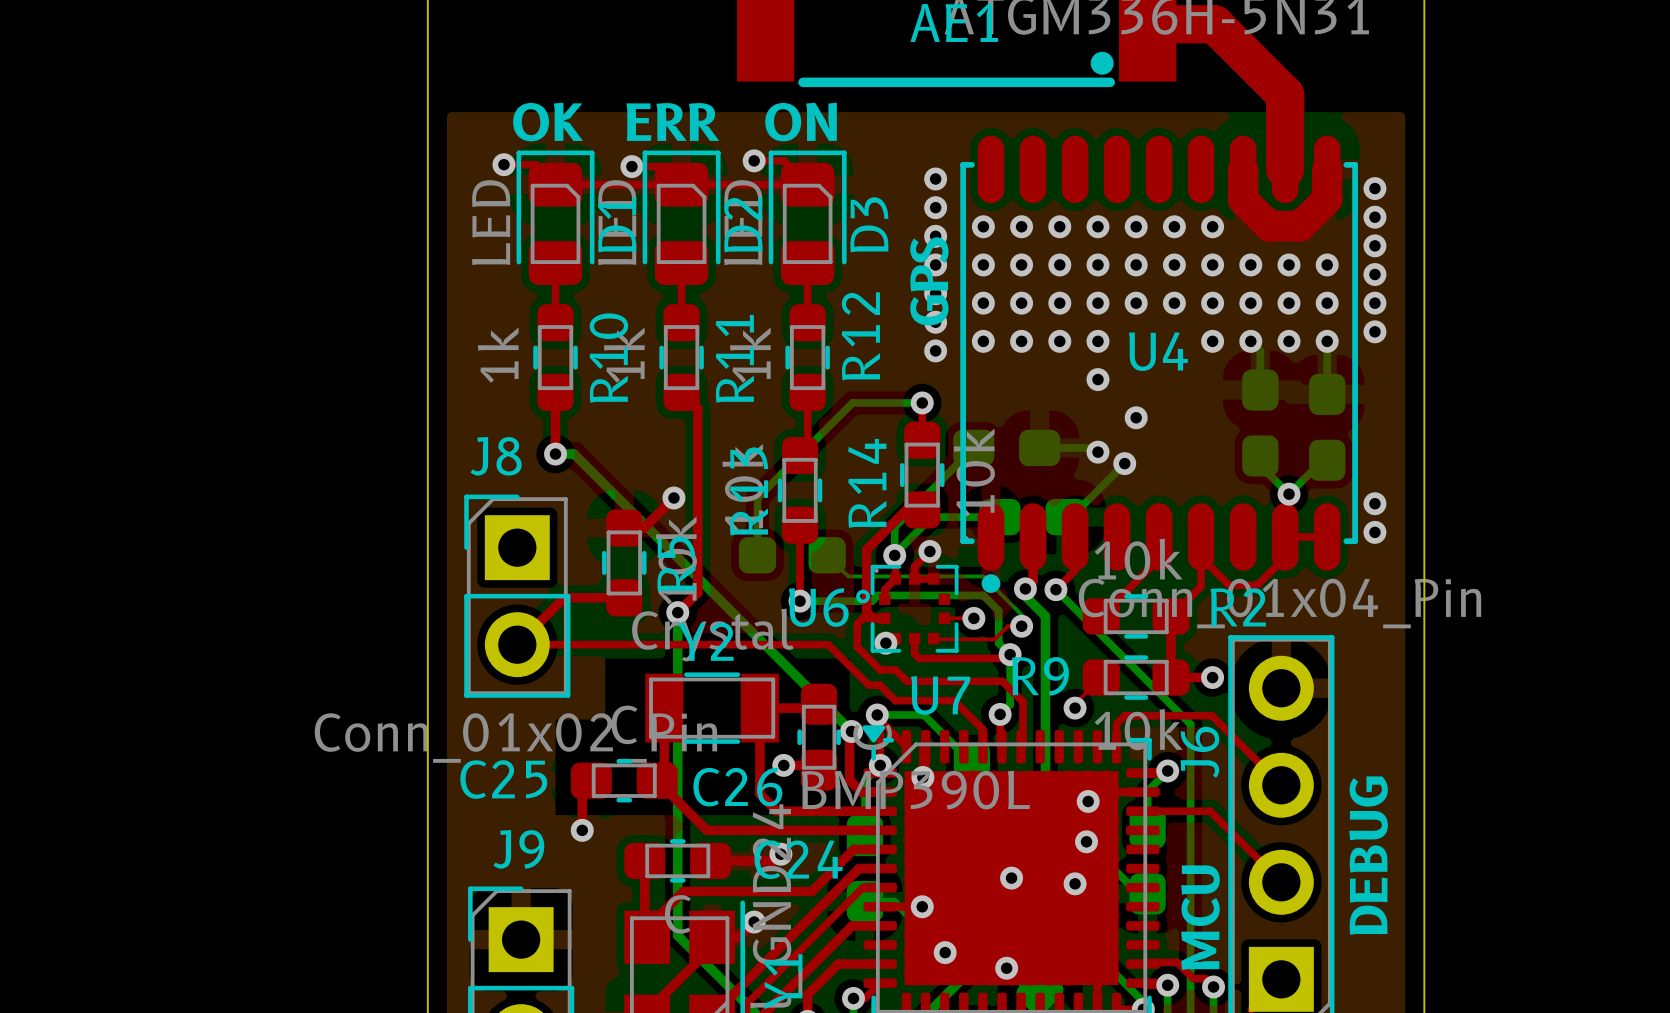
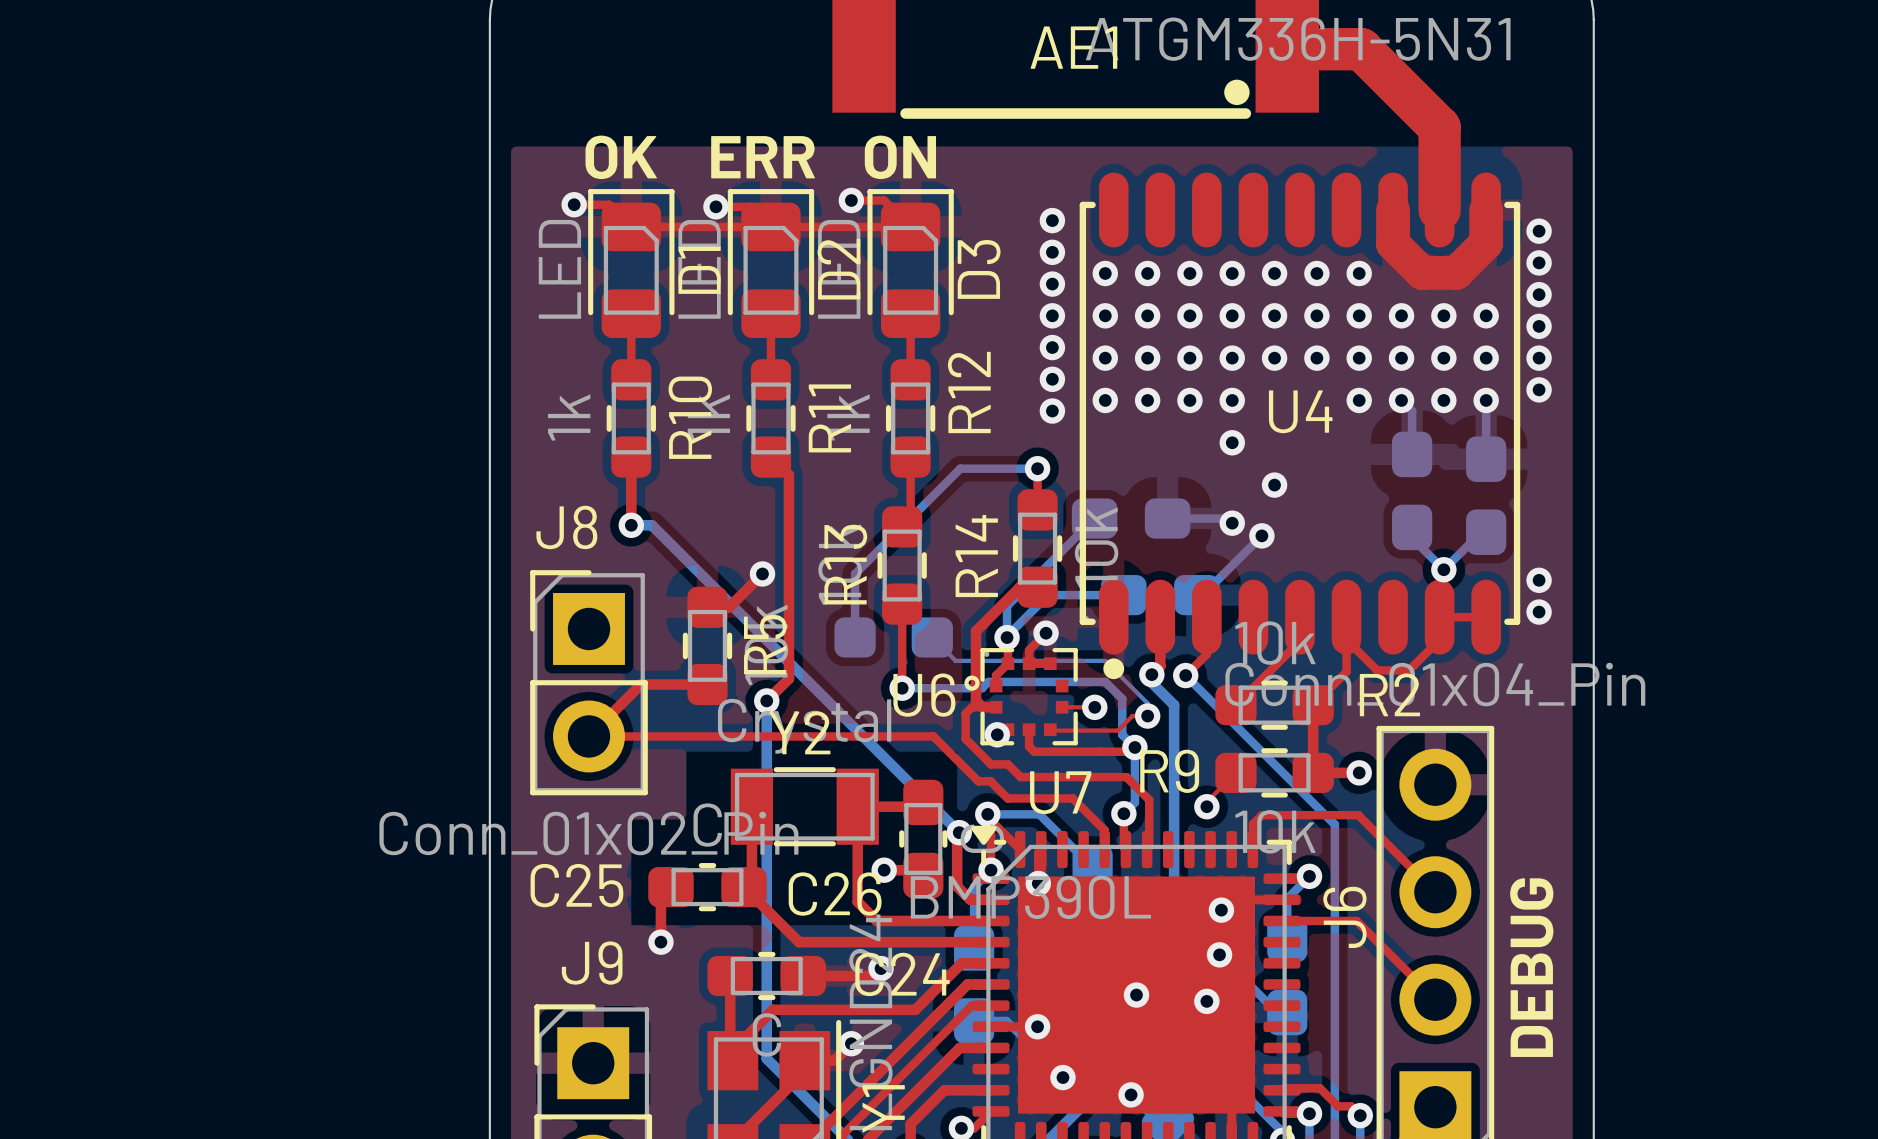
text: GPS (929, 281) -> none
J6 name position: J6 (1199, 752) -> J6 (1344, 917)
text: MCU (1200, 917) -> none

